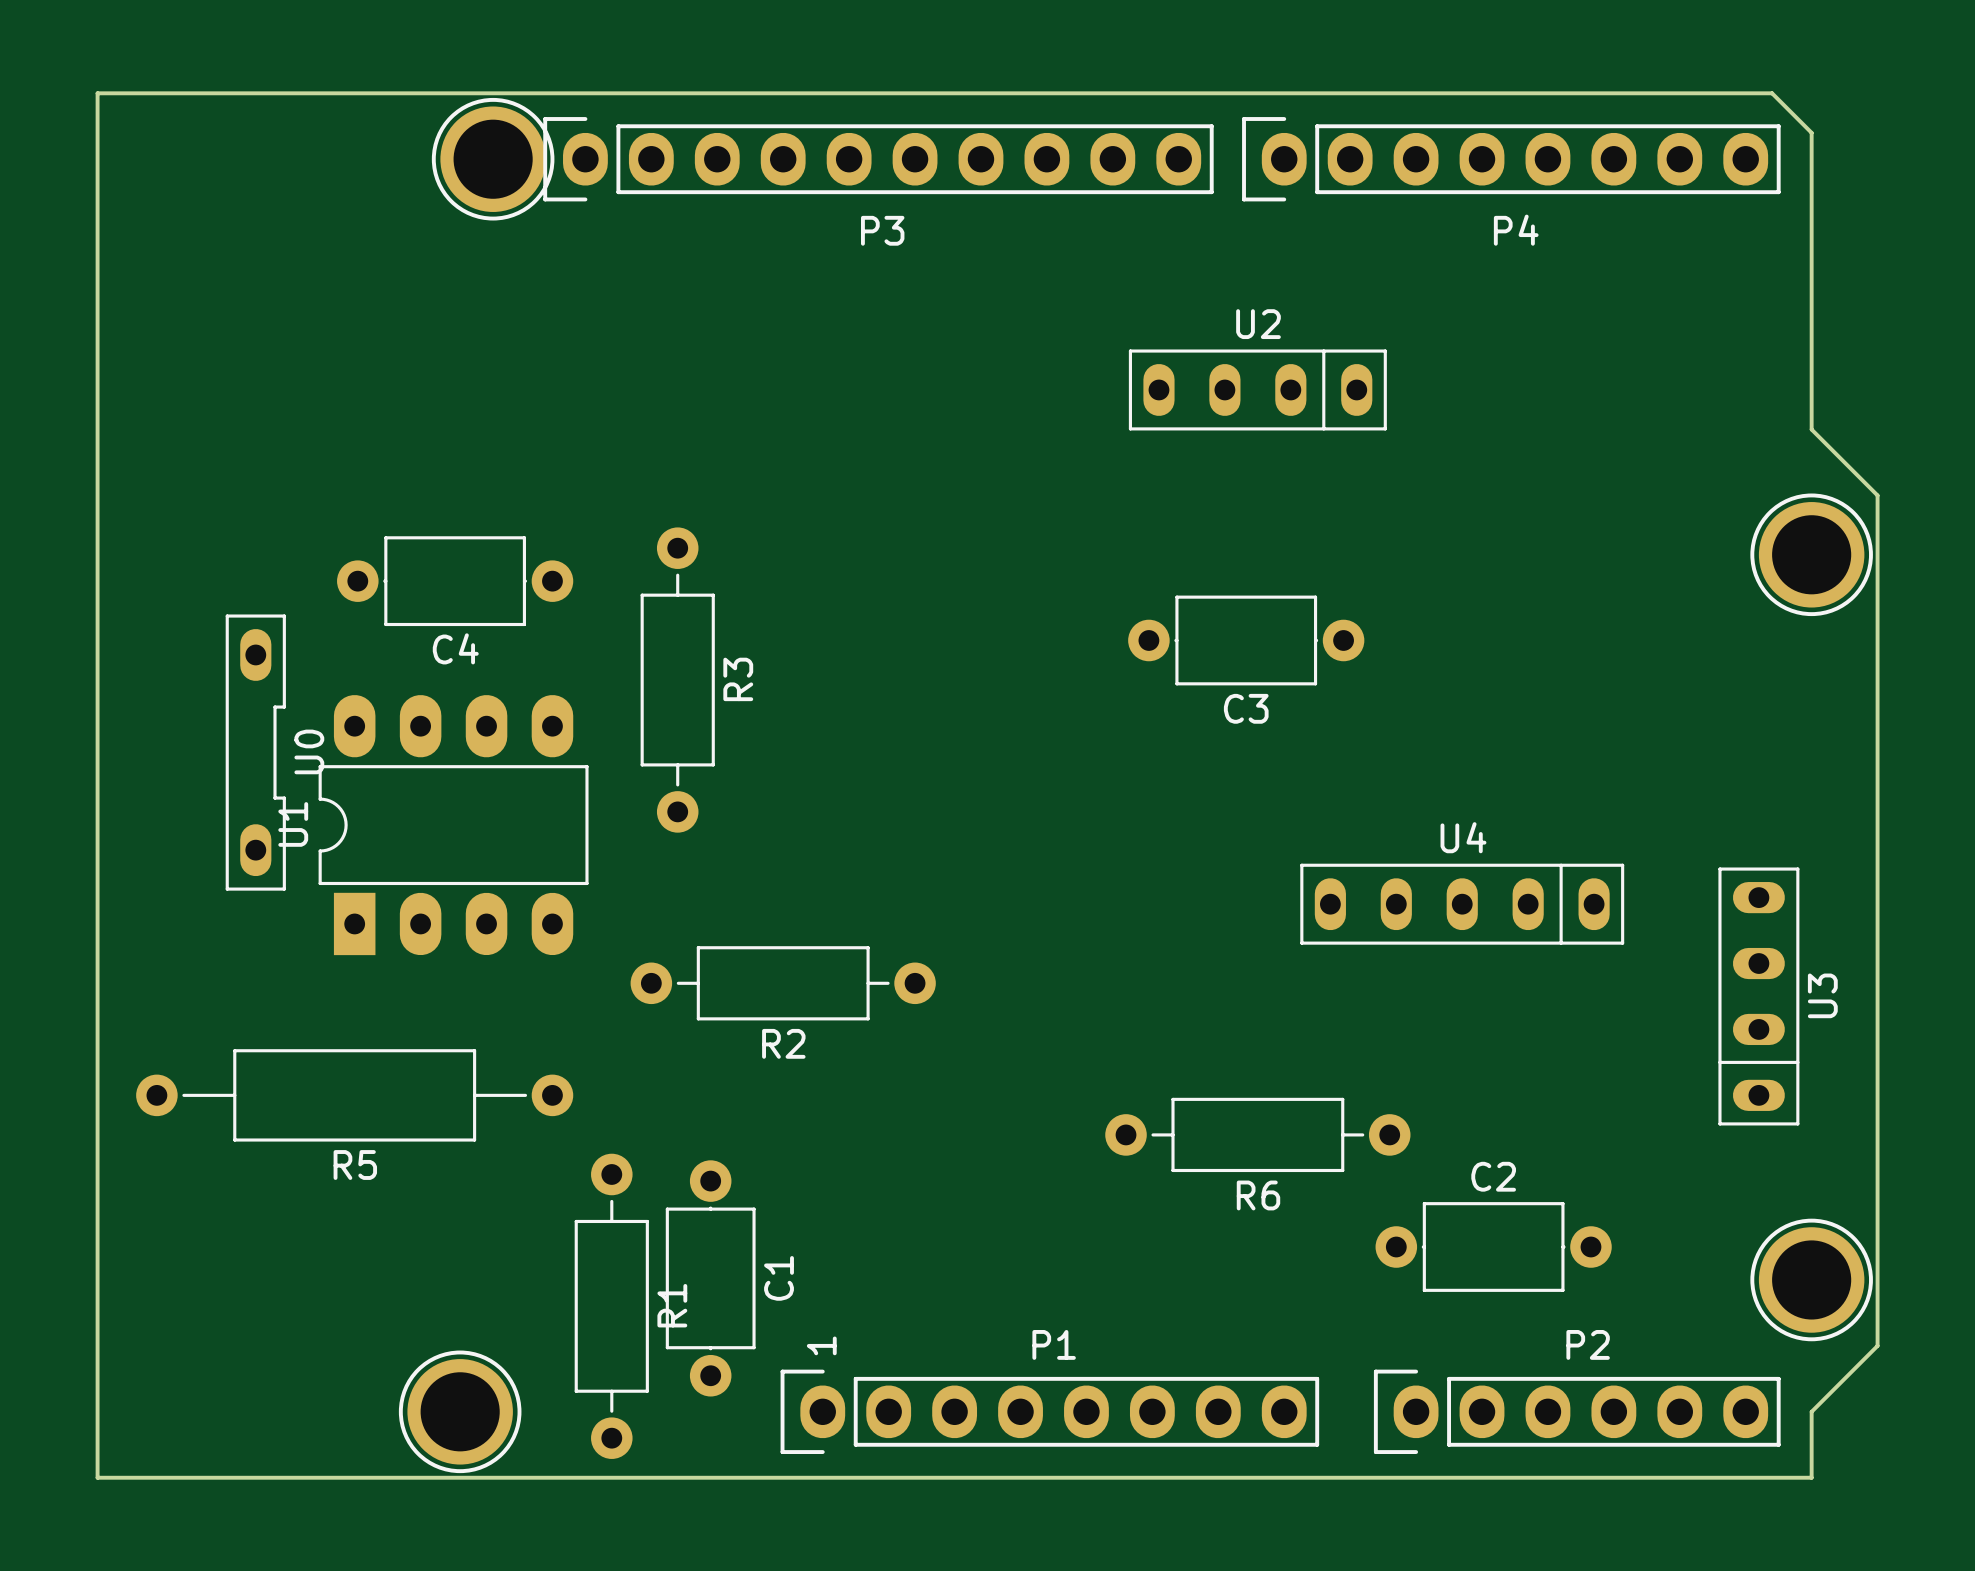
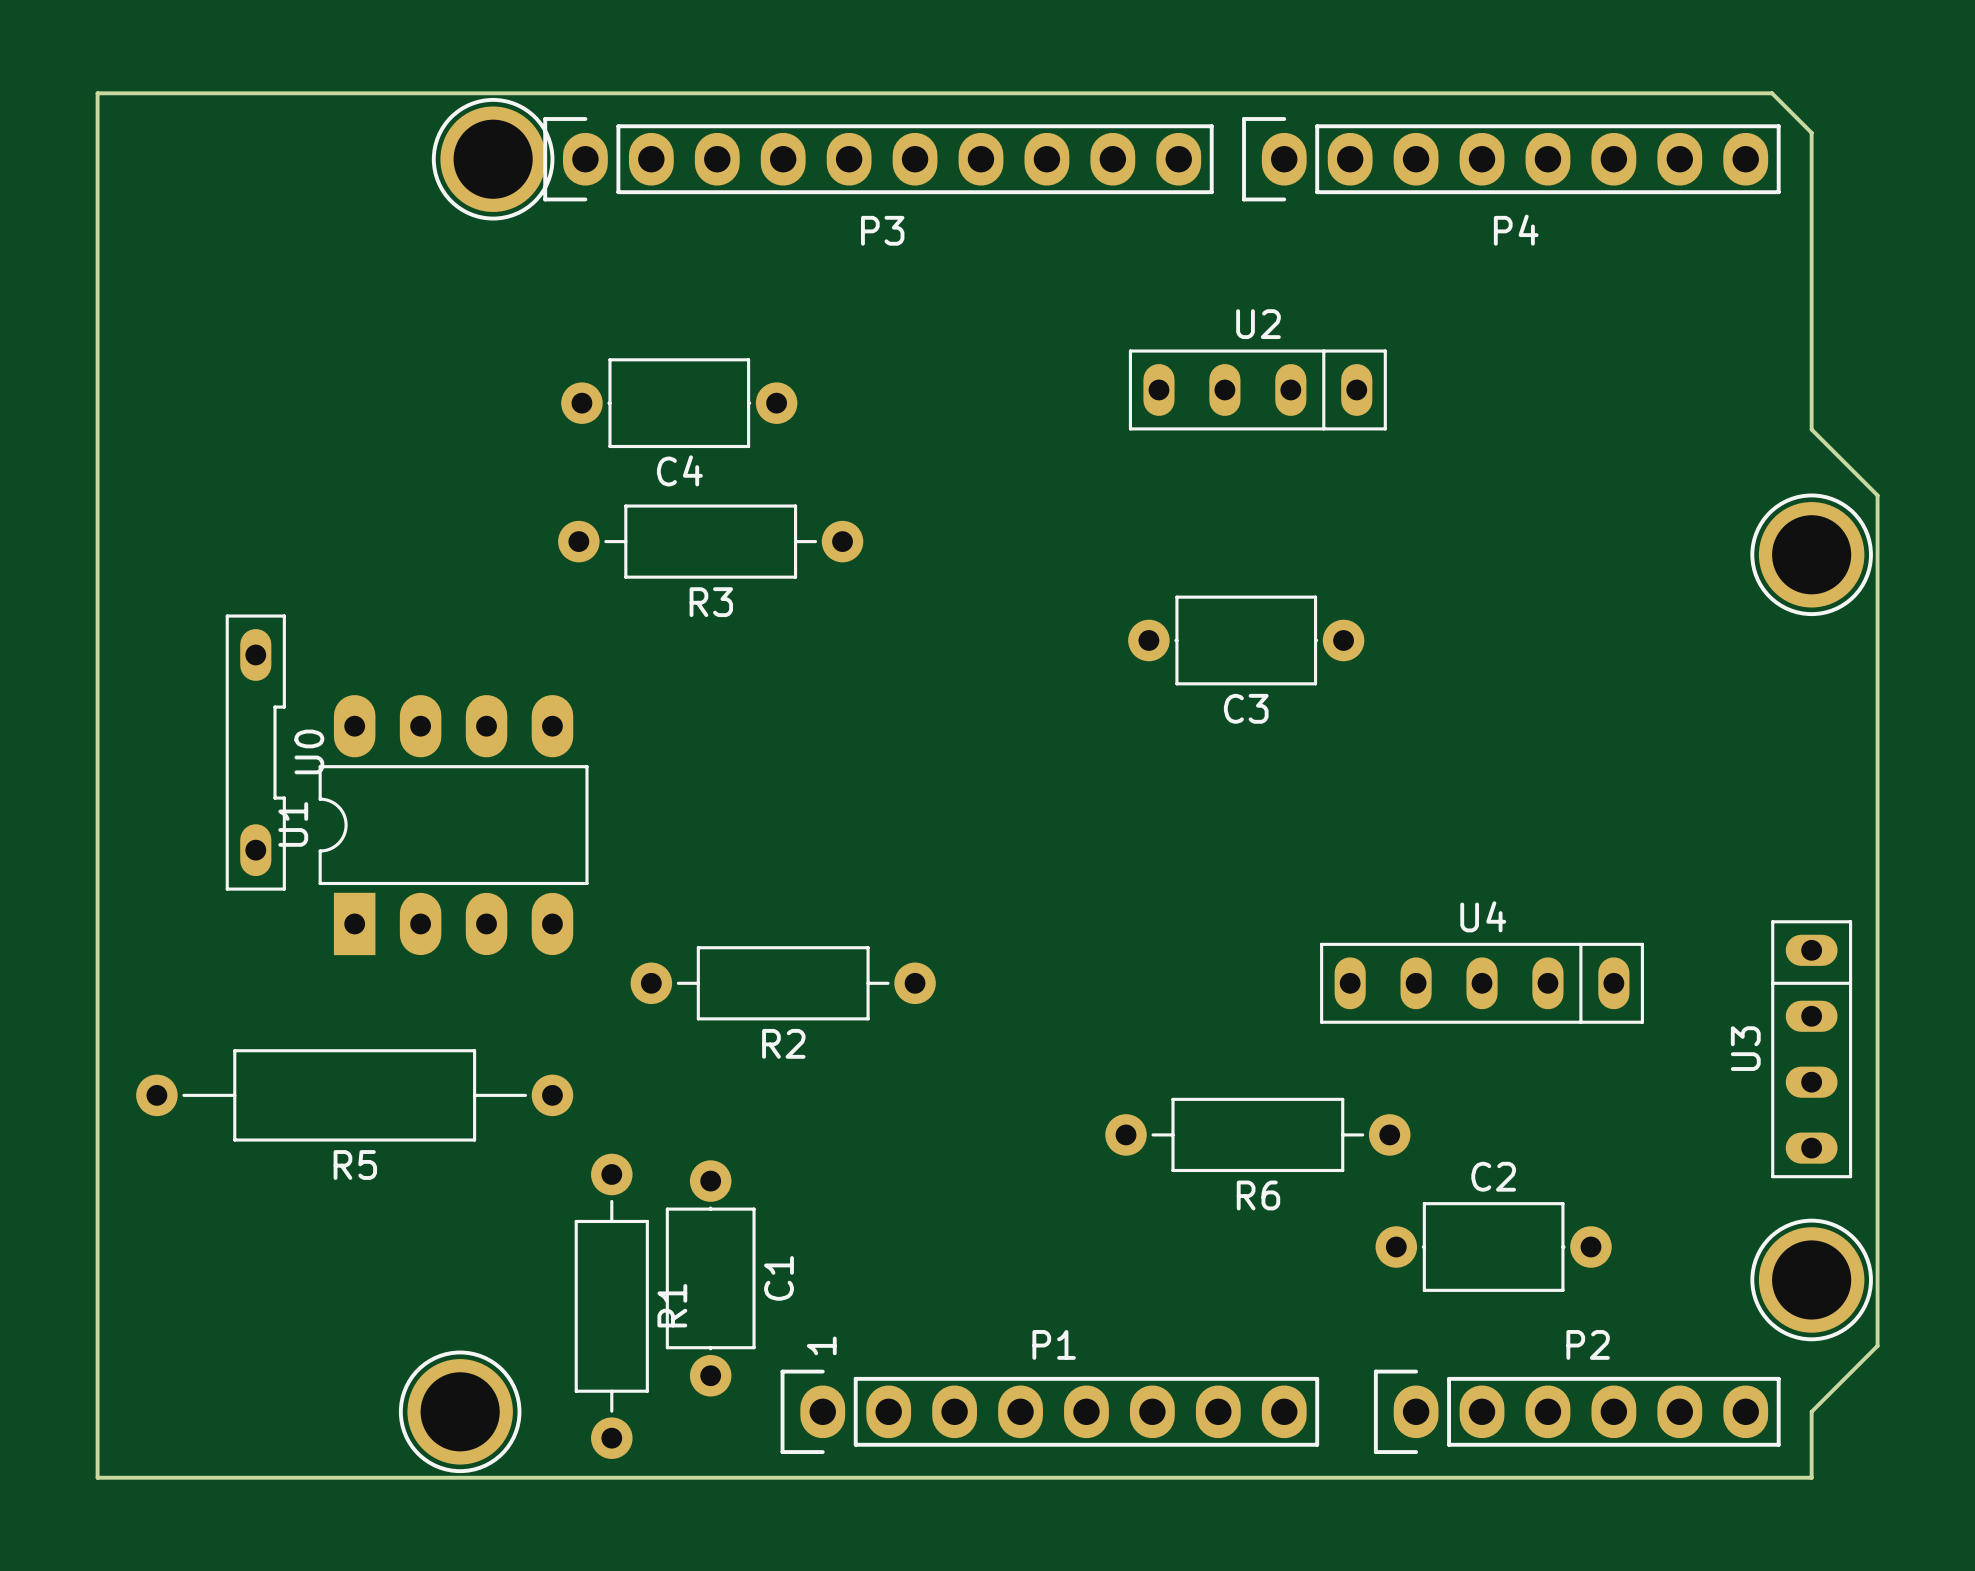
C4 position: (455, 581) -> (679, 403)
R3 rotation: 0° (677, 680) -> 90° clockwise (710, 541)
U4 position: (1462, 904) -> (1482, 983)
U3 rotation: 0° (1758, 996) -> 180° (1811, 1049)

